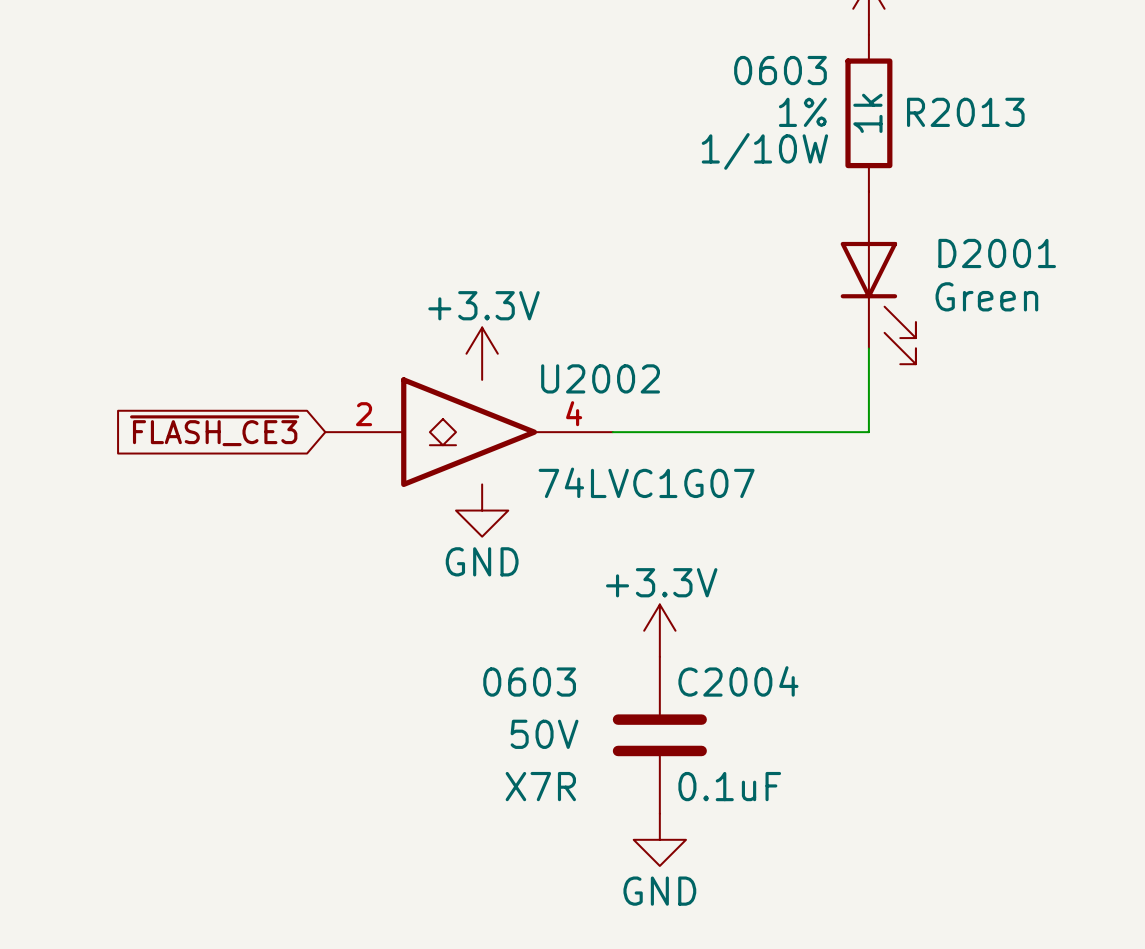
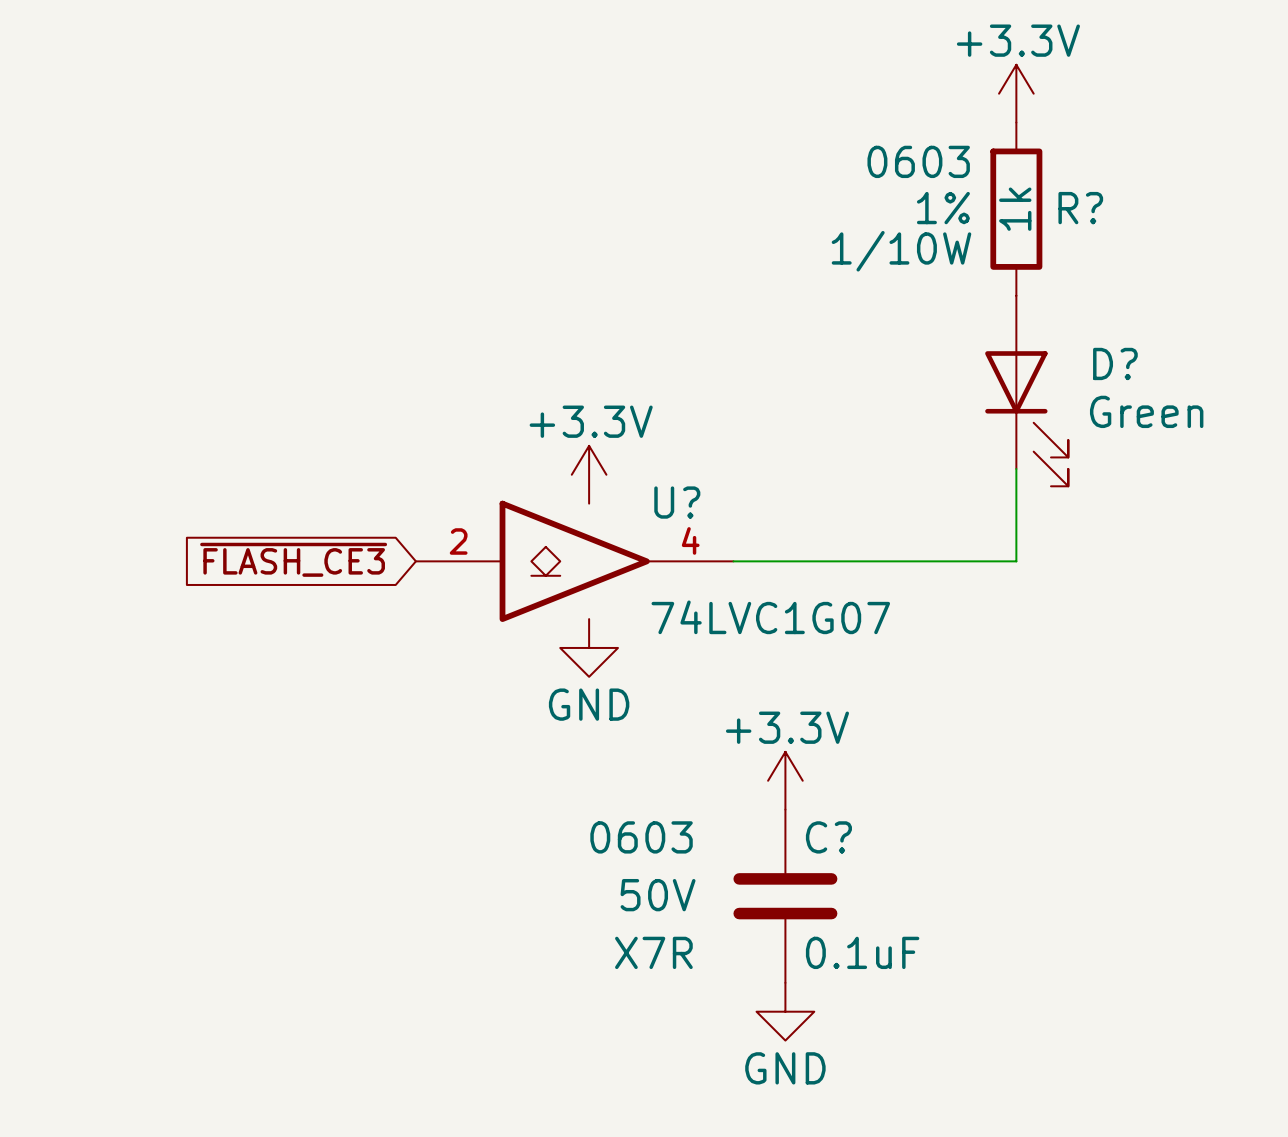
R2013 name: R2013 (965, 112) -> R? (1080, 208)
D2001 name: D2001 (997, 253) -> D? (1115, 363)
U2002 name: U2002 (600, 378) -> U? (677, 502)
C2004 name: C2004 (738, 681) -> C? (828, 837)

